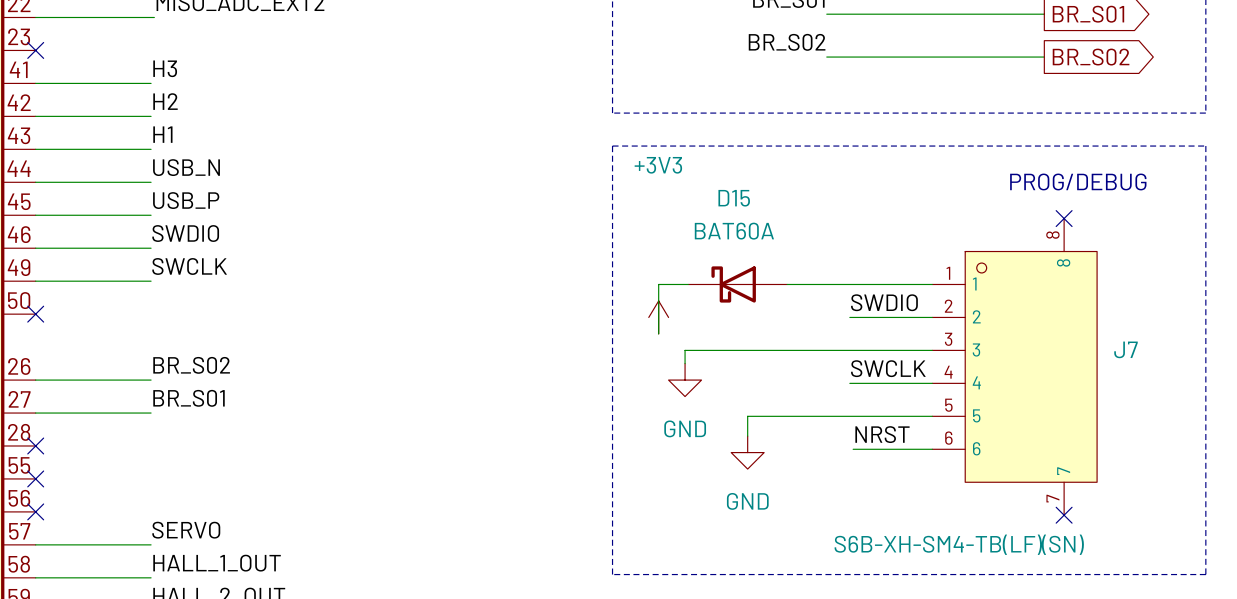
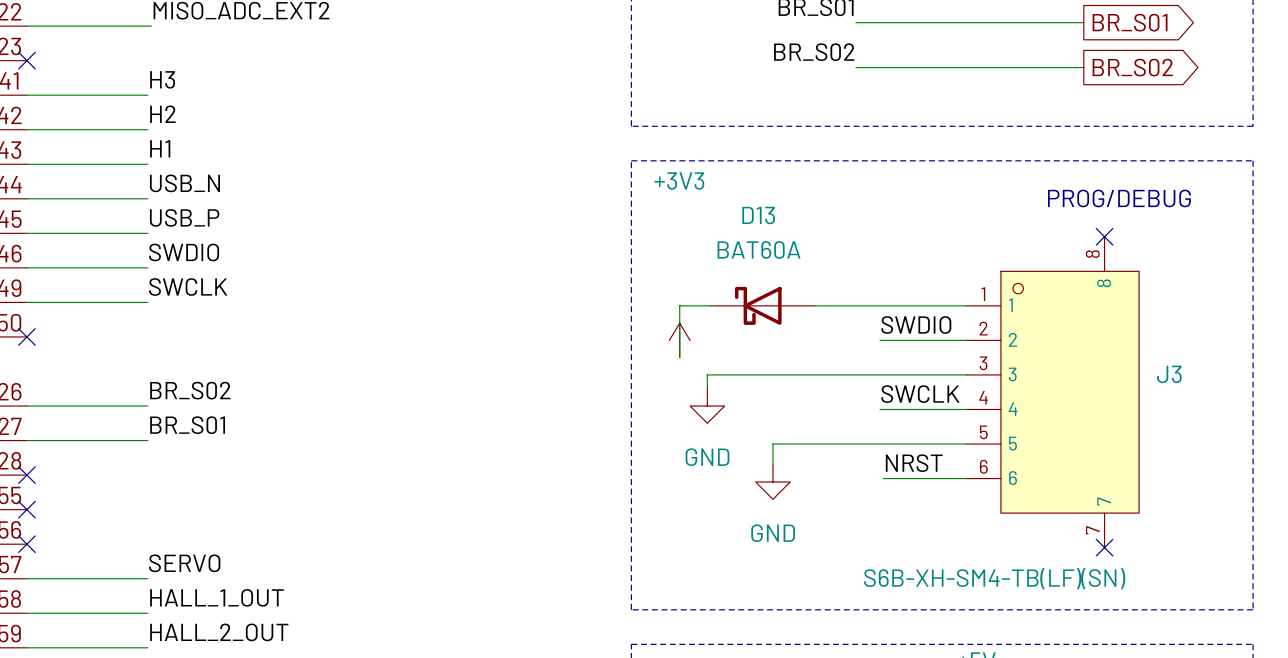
D15 name: D15 (734, 198) -> D13 (758, 215)
J7 name: J7 (1125, 349) -> J3 (1169, 374)

